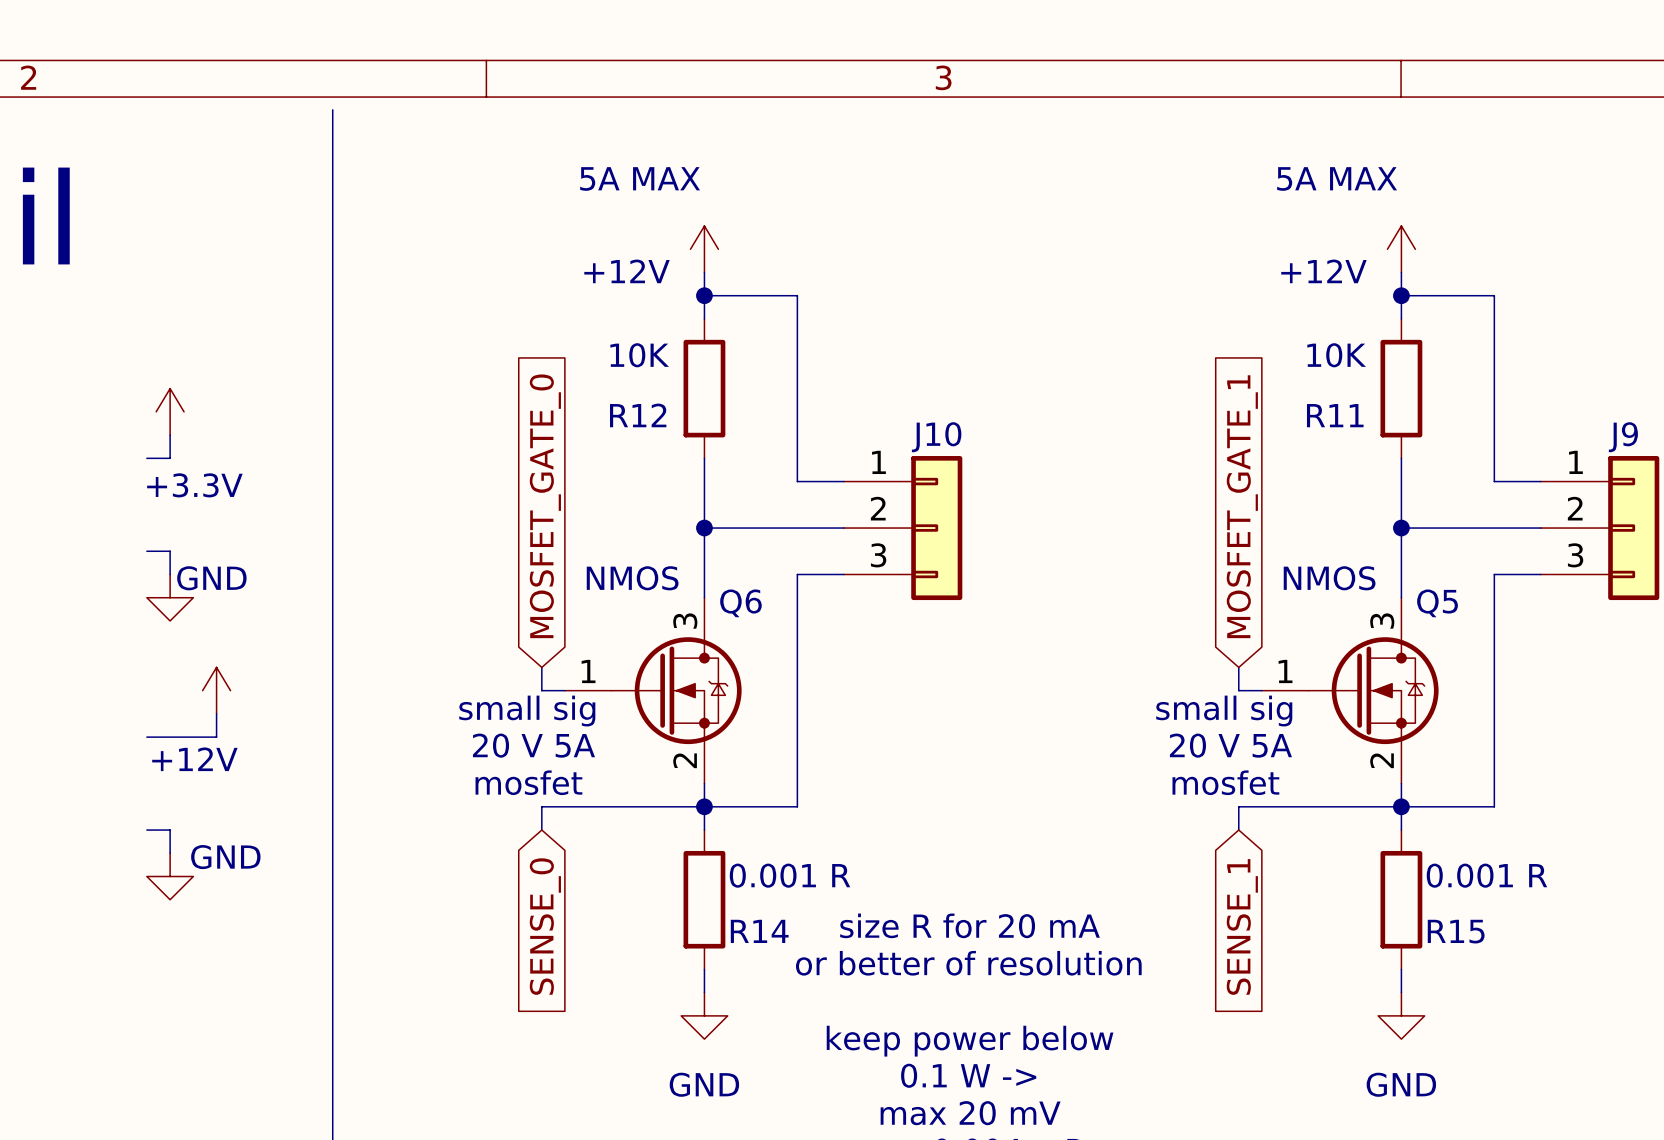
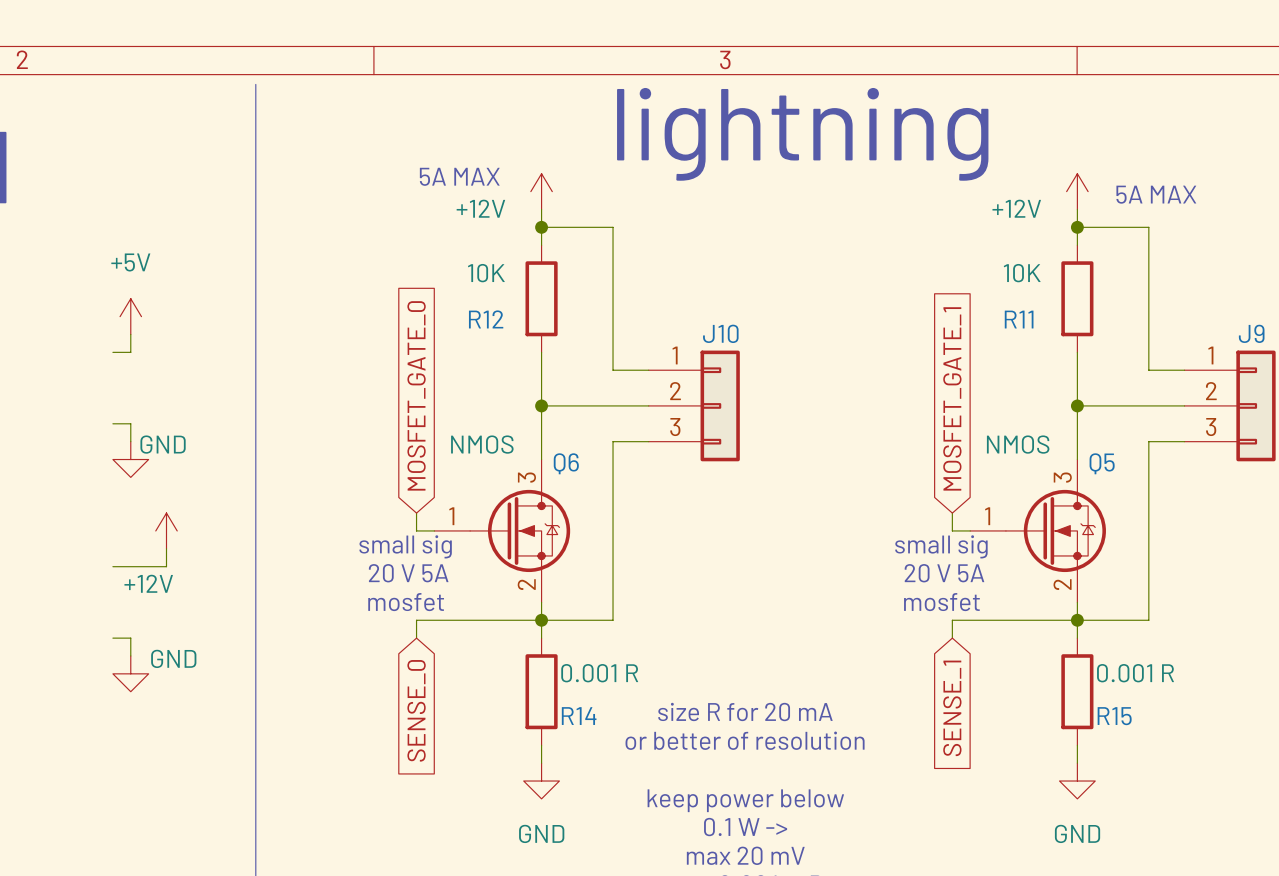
text: none -> lightning (802, 134)
text position: 5A MAX (640, 178) -> 5A MAX (459, 176)
text position: 5A MAX (1337, 178) -> 5A MAX (1156, 194)
power symbol: +3.3V (170, 411) -> +5V (130, 316)

